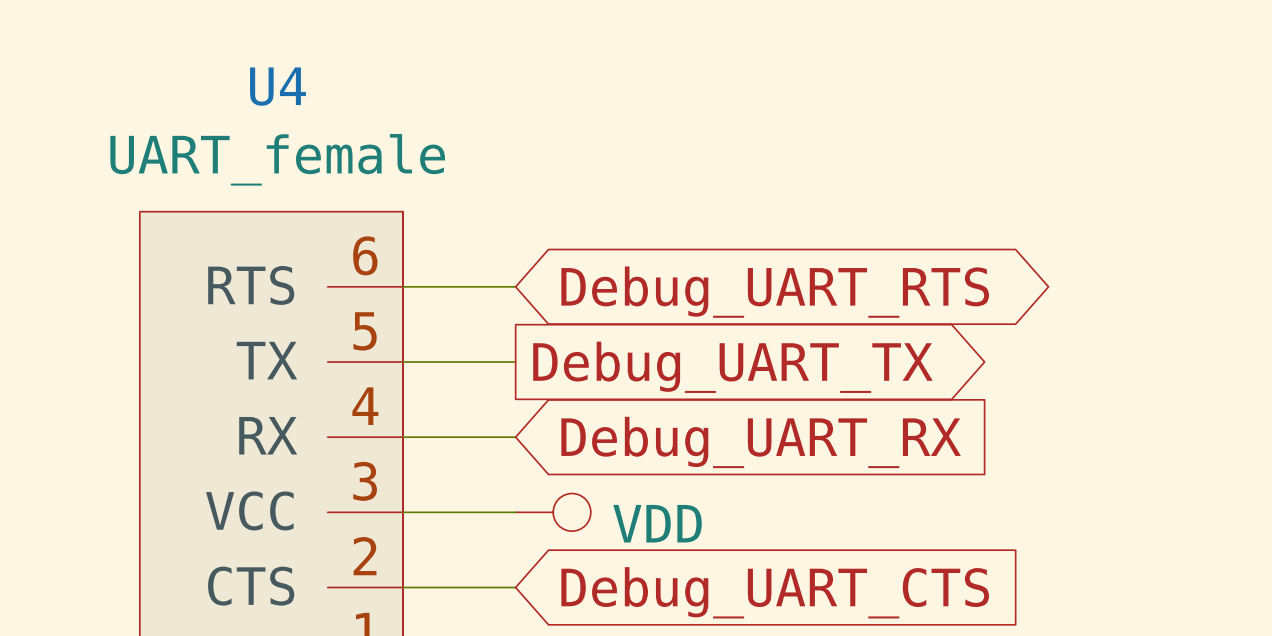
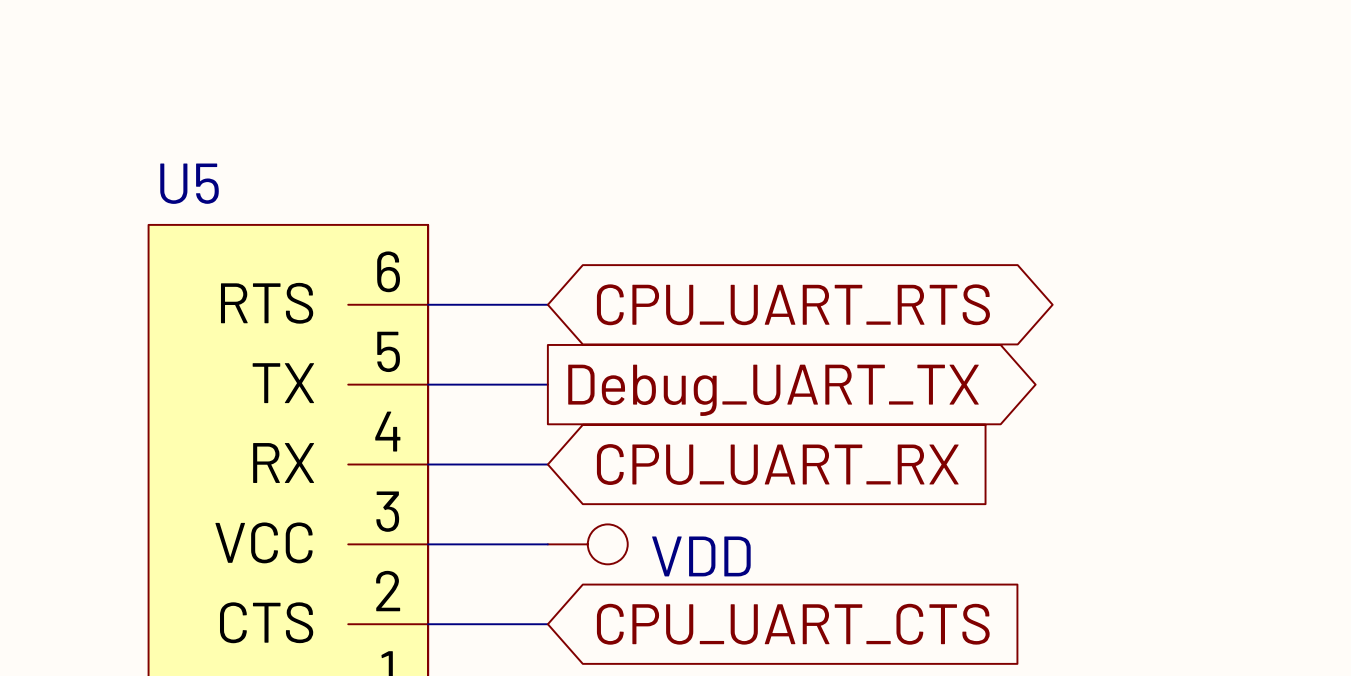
U4 name: U4 (277, 86) -> U5 (189, 183)
U4 value: UART_female (277, 159) -> none
global label: Debug_UART_RTS (775, 292) -> CPU_UART_RTS (793, 304)
global label: Debug_UART_RX (761, 442) -> CPU_UART_RX (777, 464)
global label: Debug_UART_CTS (775, 592) -> CPU_UART_CTS (793, 624)

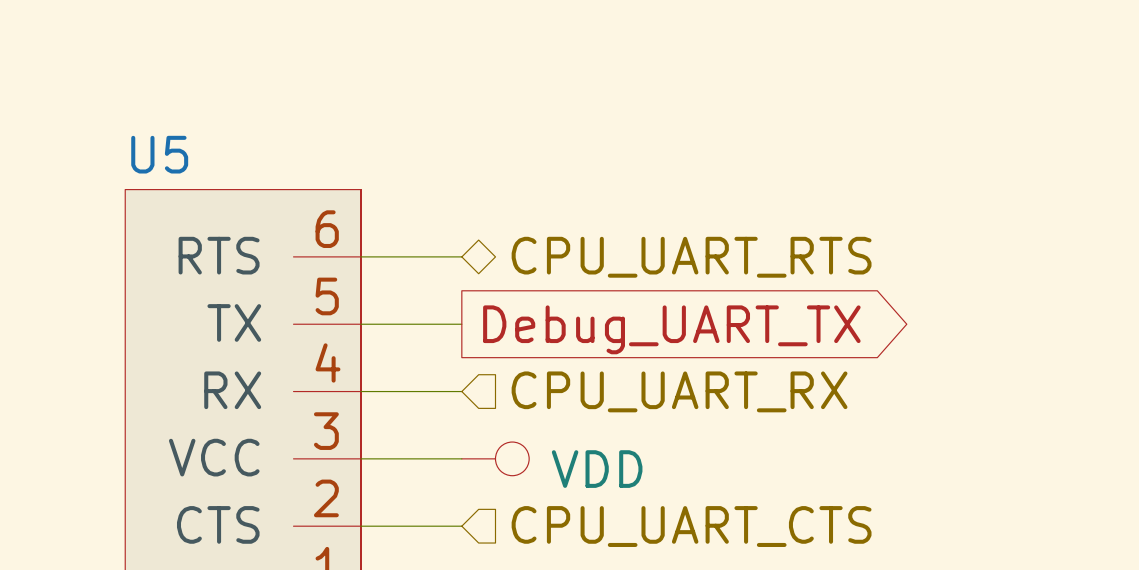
hierarchical label: none -> CPU_UART_RTS (691, 257)
global label: CPU_UART_RTS (793, 304) -> none
hierarchical label: none -> CPU_UART_RX (679, 391)
global label: CPU_UART_RX (777, 464) -> none
hierarchical label: none -> CPU_UART_CTS (691, 526)
global label: CPU_UART_CTS (793, 624) -> none

